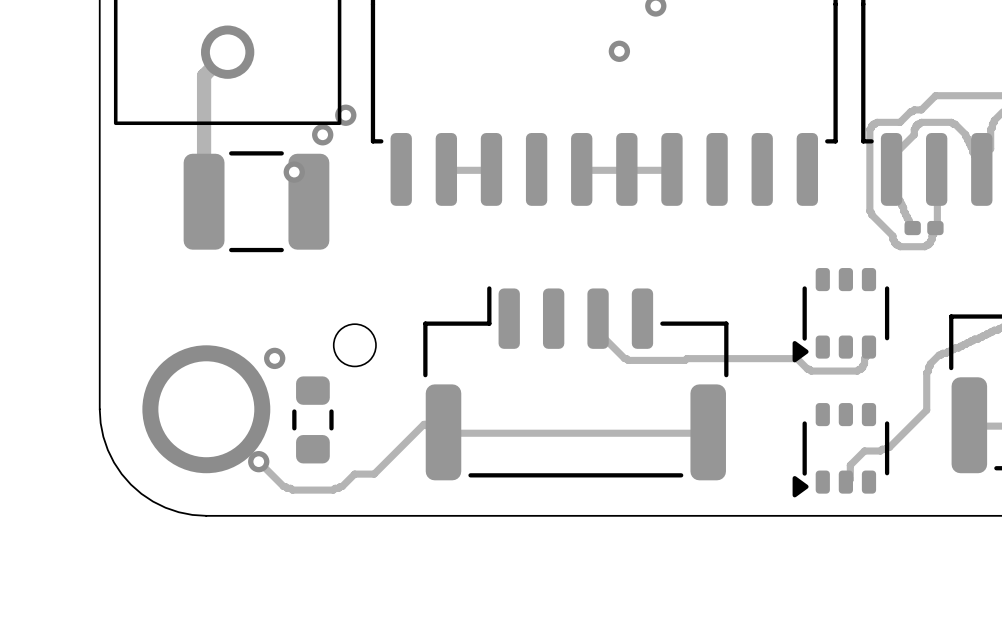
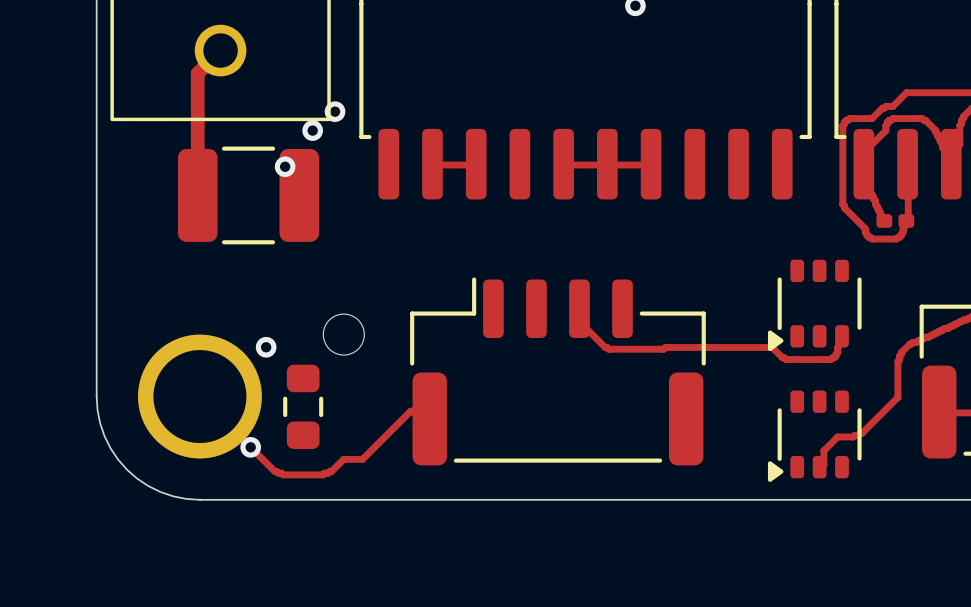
via: (619, 51) -> none
track: (443, 433) (708, 433) -> none

